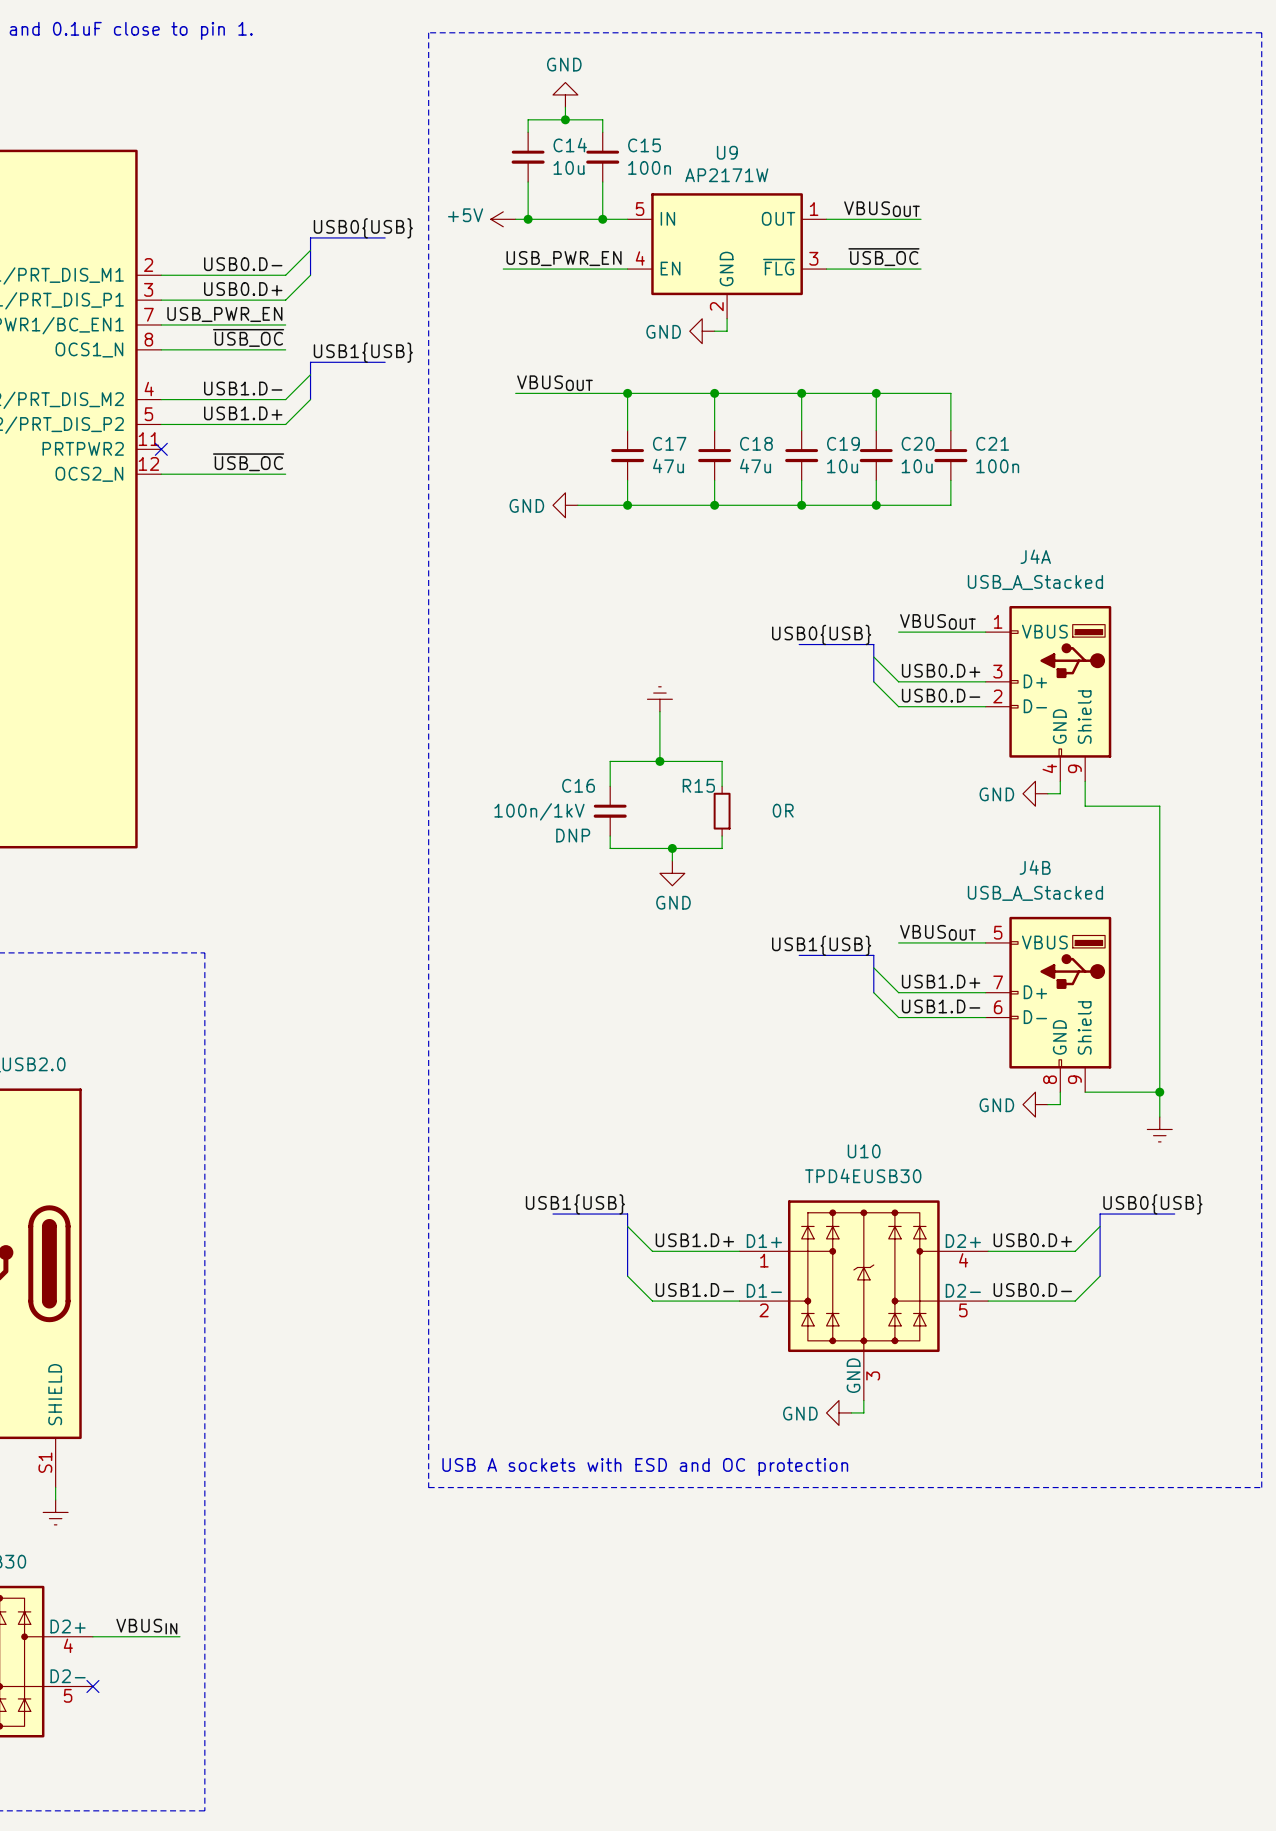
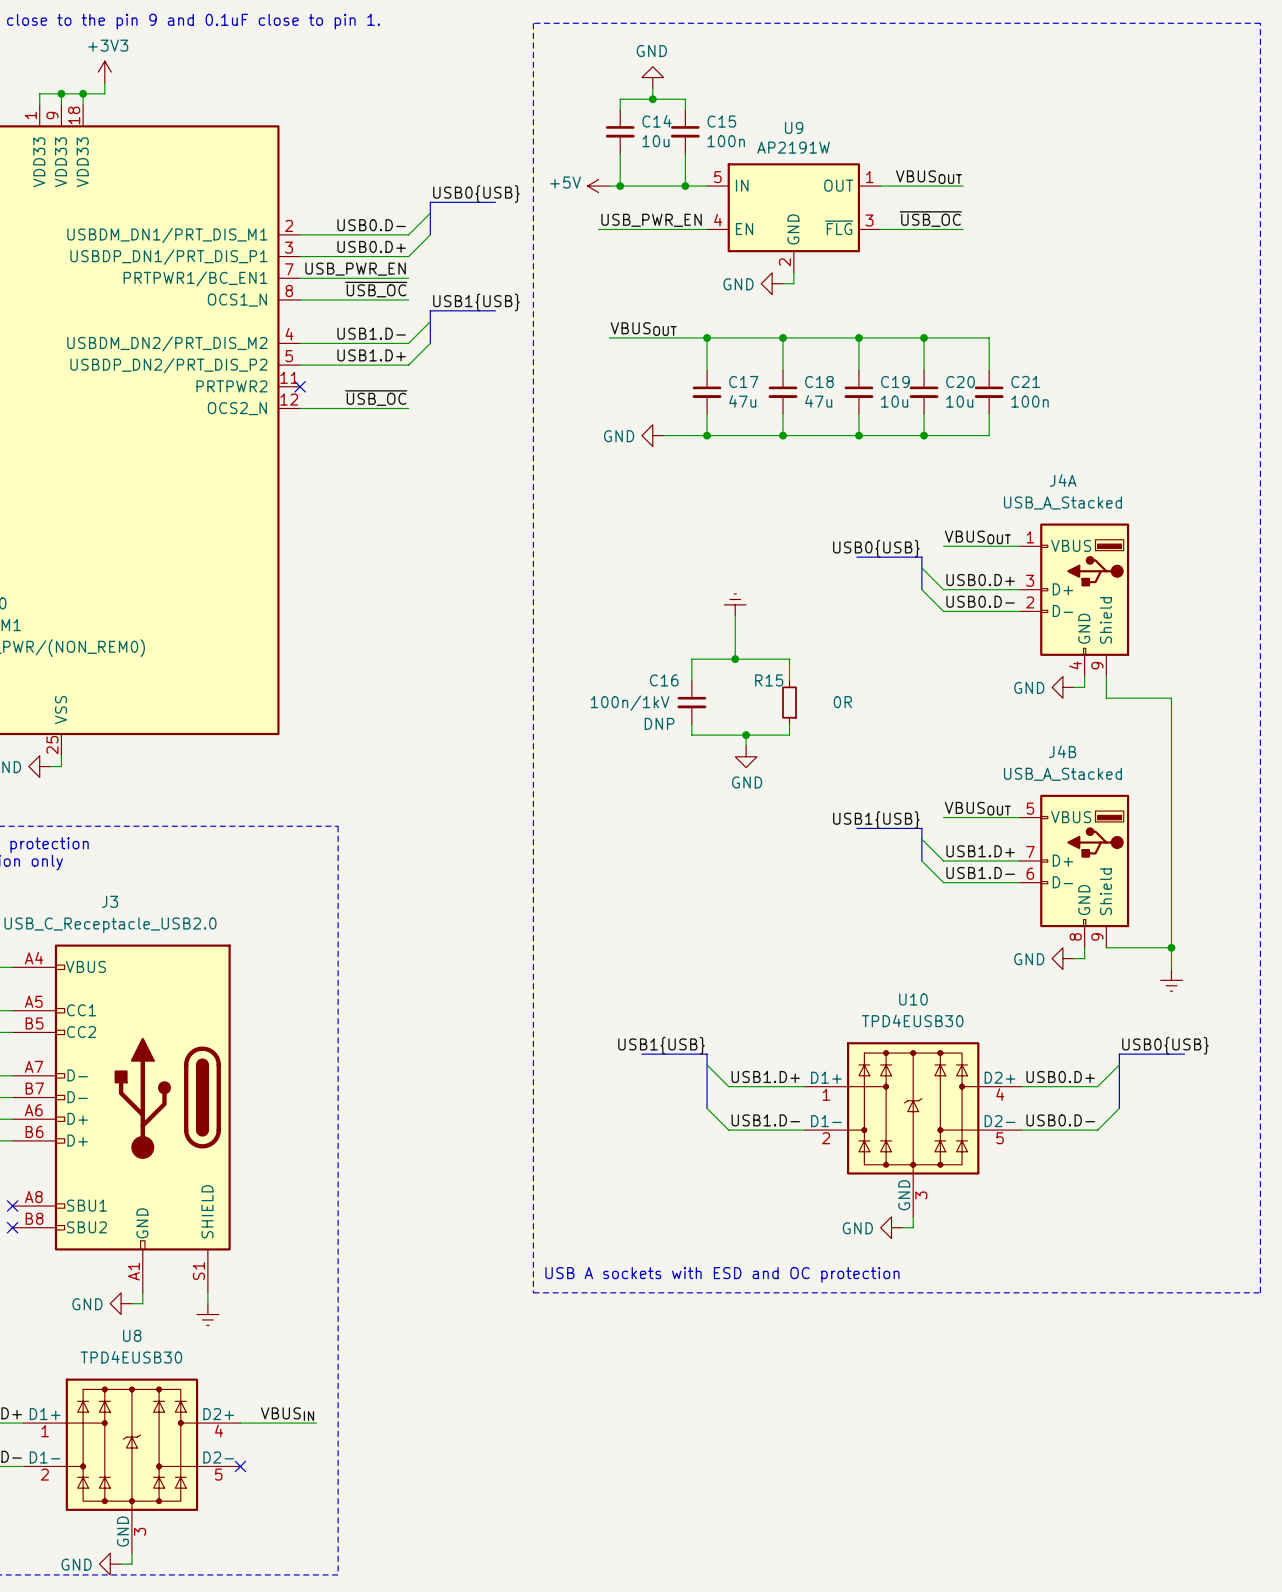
U9 value: AP2171W (726, 175) -> AP2191W (793, 147)

